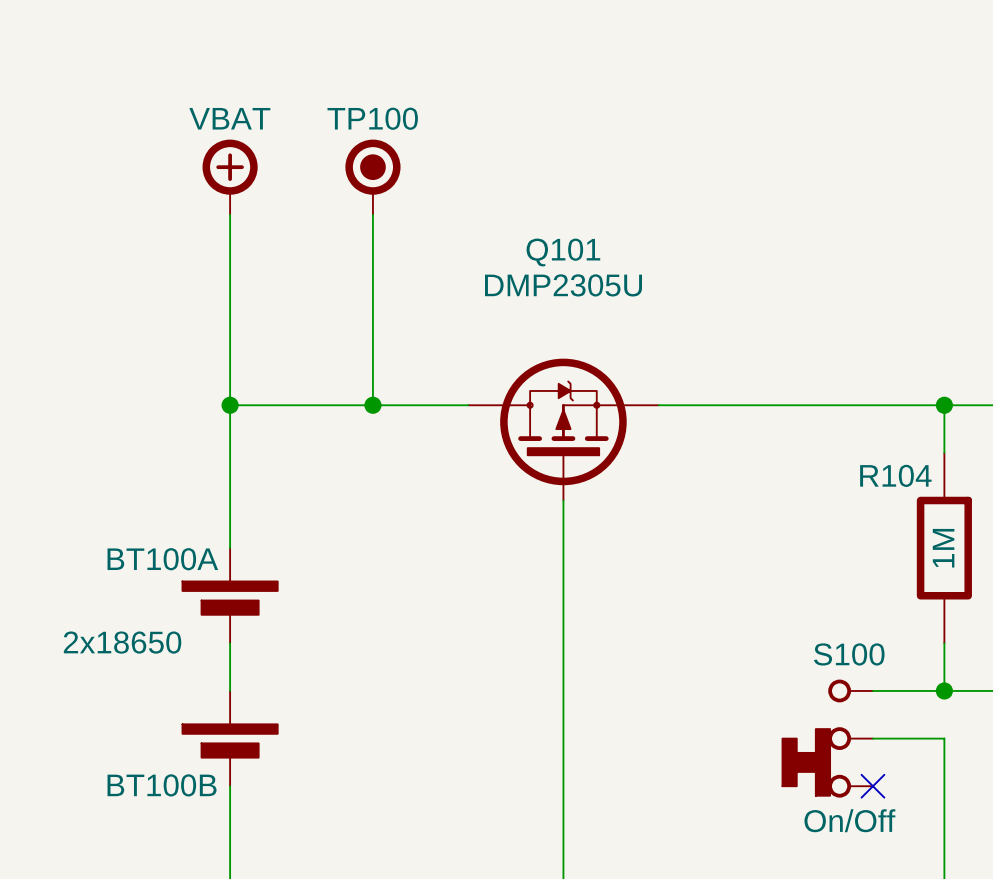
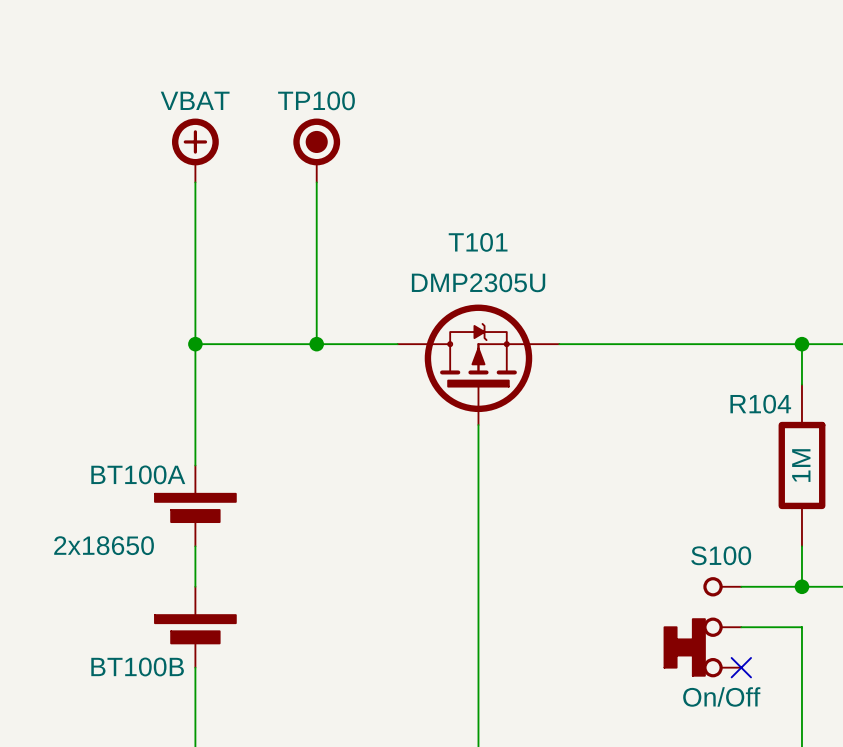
Q101 name: Q101 (563, 252) -> T101 (478, 242)
Q101 value position: DMP2305U (563, 285) -> DMP2305U (478, 282)

